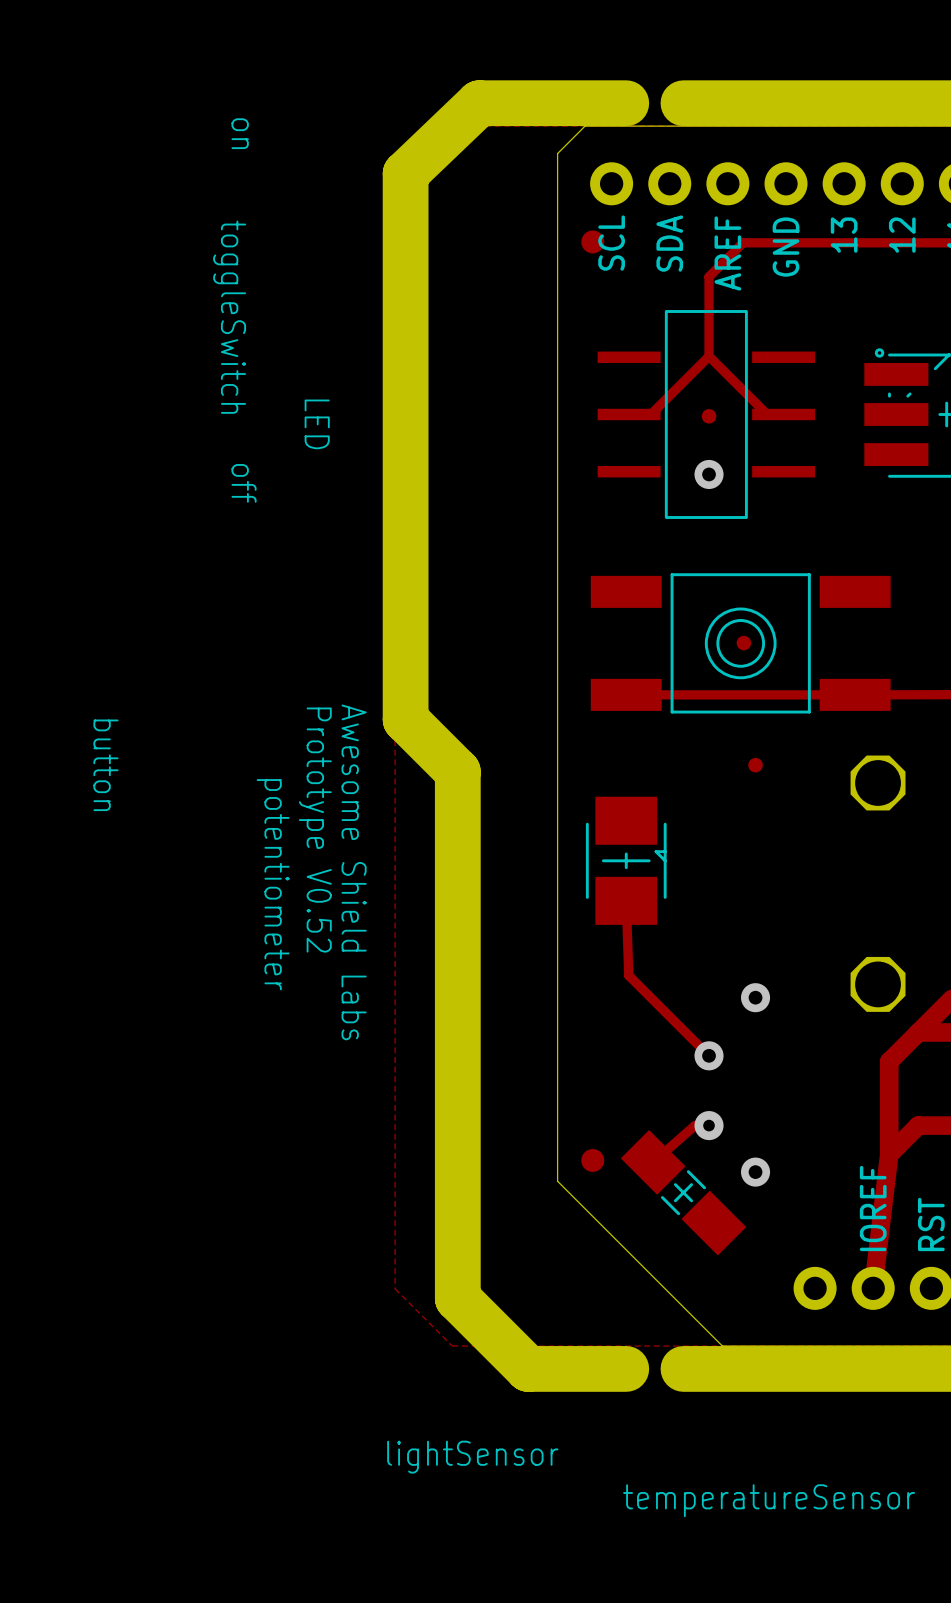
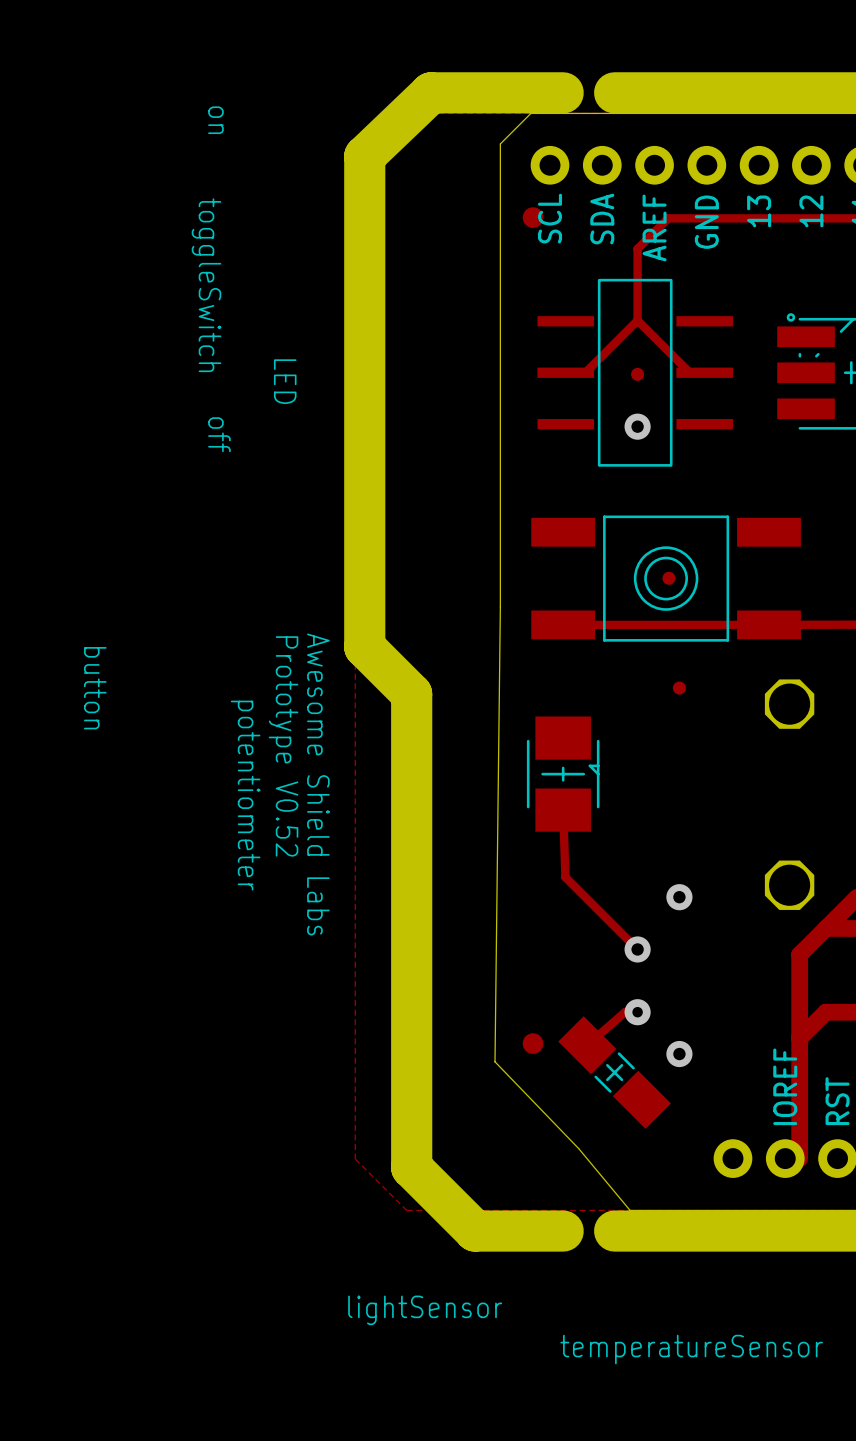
board edge: (590, 126) (585, 126) (557, 153) (557, 1181) (722, 1346) -> (530, 113) (500, 143) (500, 607) (495, 1061) (578, 1148) (630, 1210) (649, 1210)
track: (889, 1154) (873, 1288) -> (799, 1038) (799, 1158)

